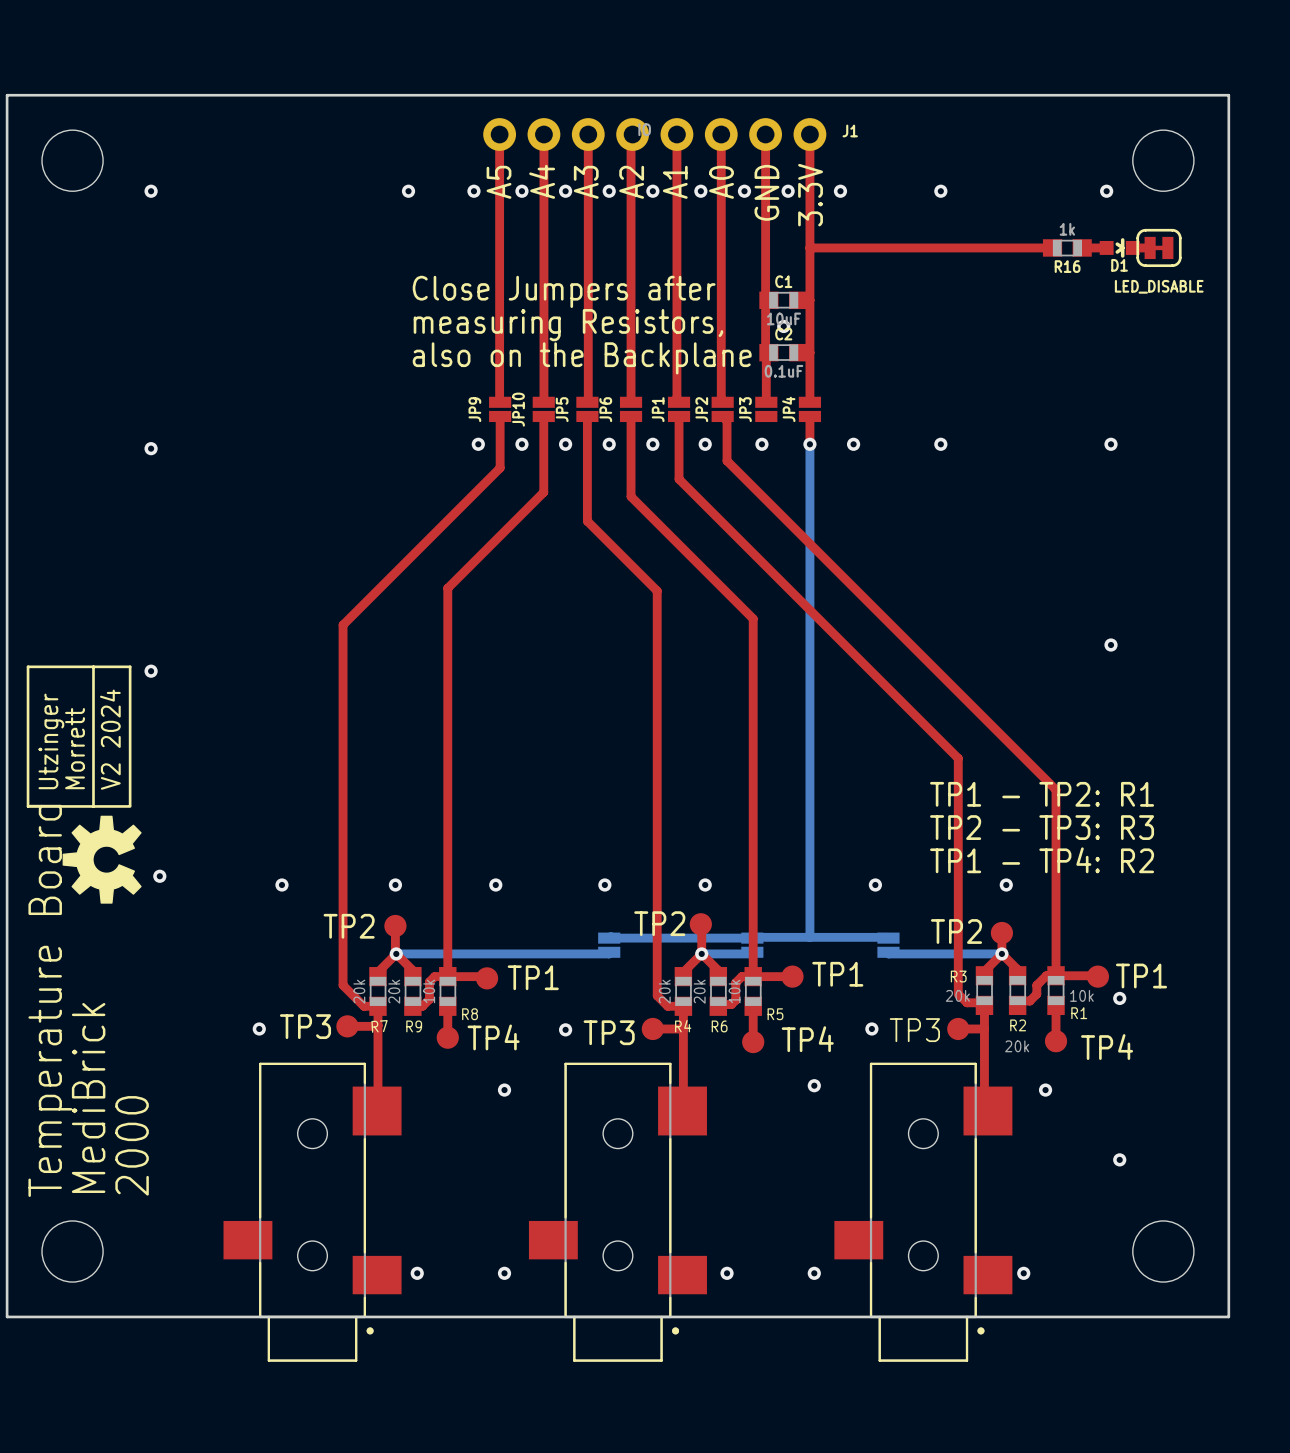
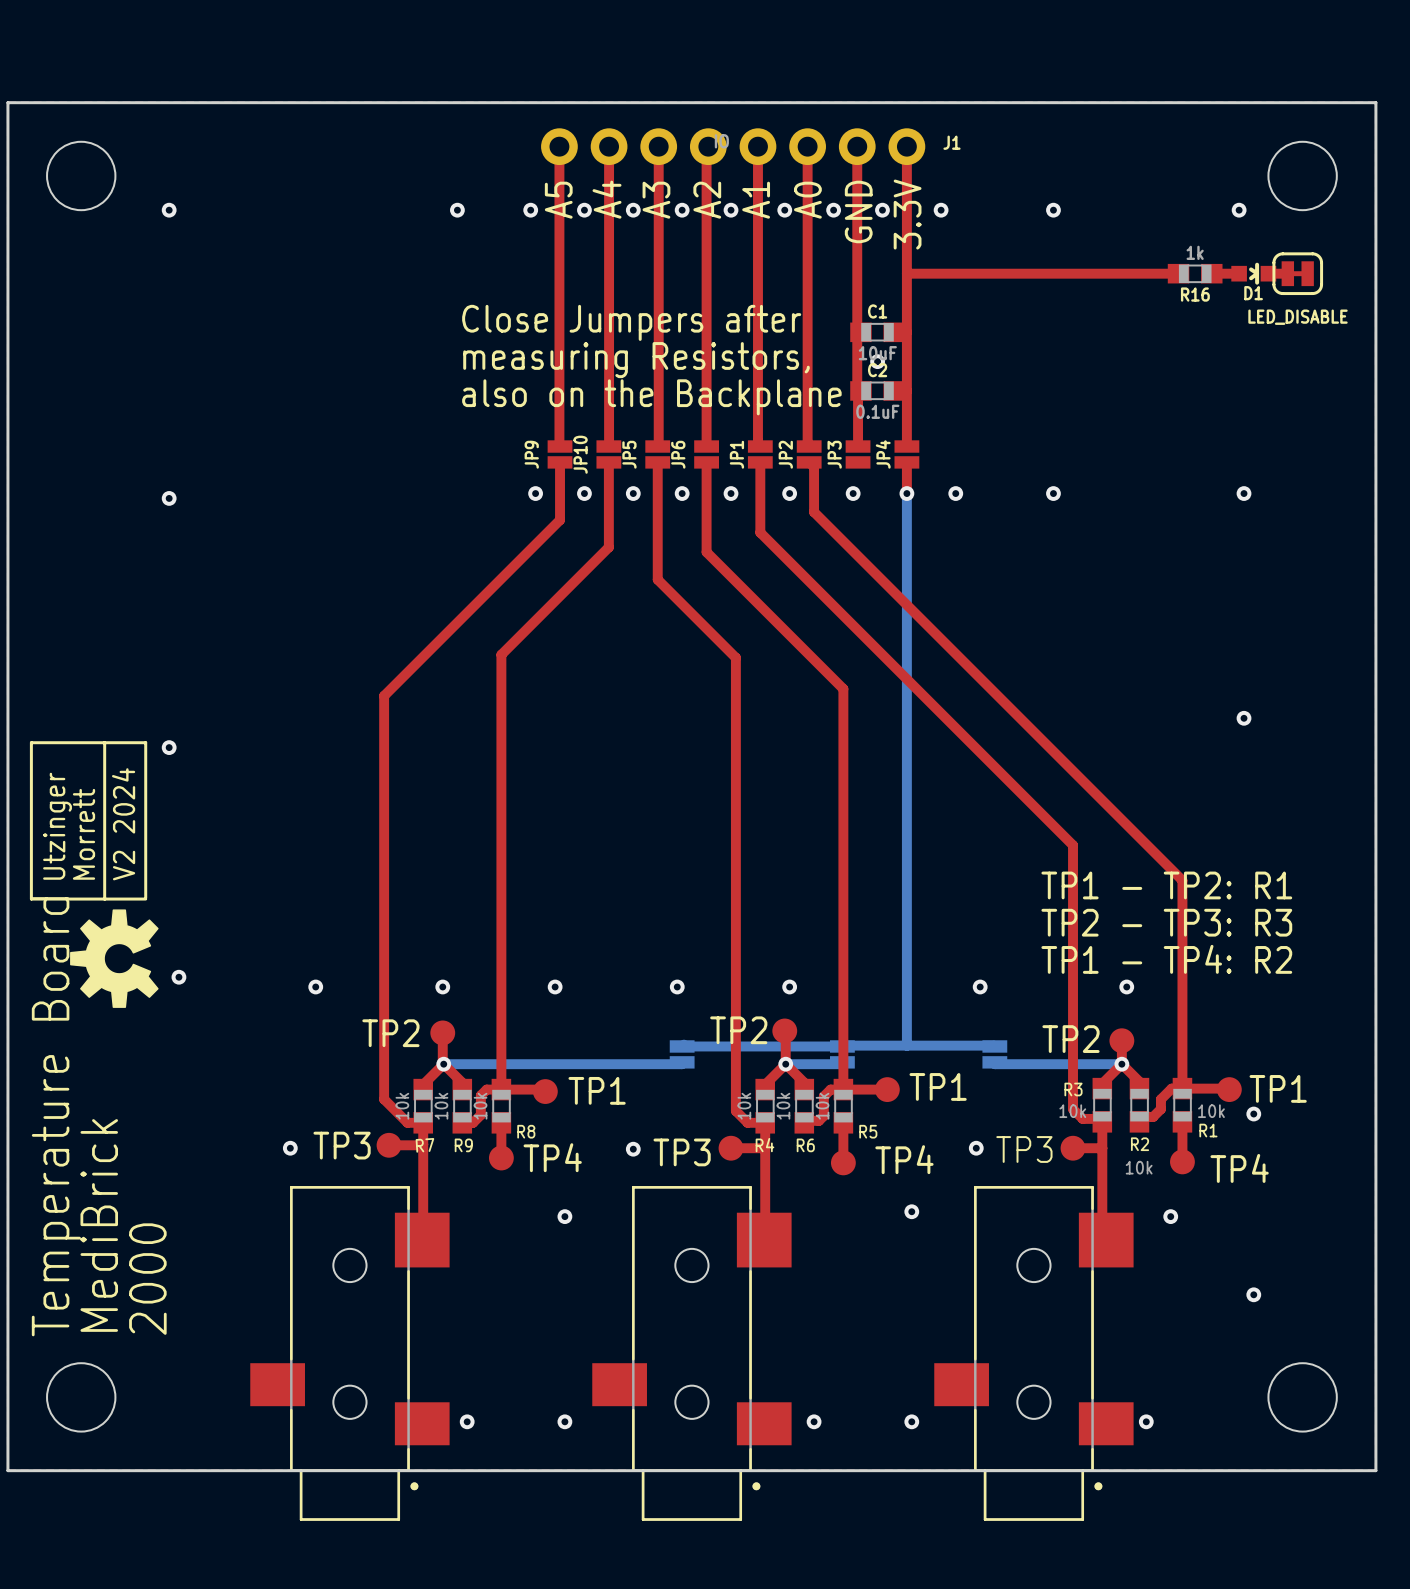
R7 value: 20k (359, 991) -> 10k (402, 1106)
R9 value: 20k (394, 991) -> 10k (441, 1106)
R4 value: 20k (664, 991) -> 10k (744, 1106)
R6 value: 20k (699, 991) -> 10k (783, 1106)
R3 value: 20k (957, 995) -> 10k (1072, 1111)
R2 value: 20k (1017, 1046) -> 10k (1139, 1167)

